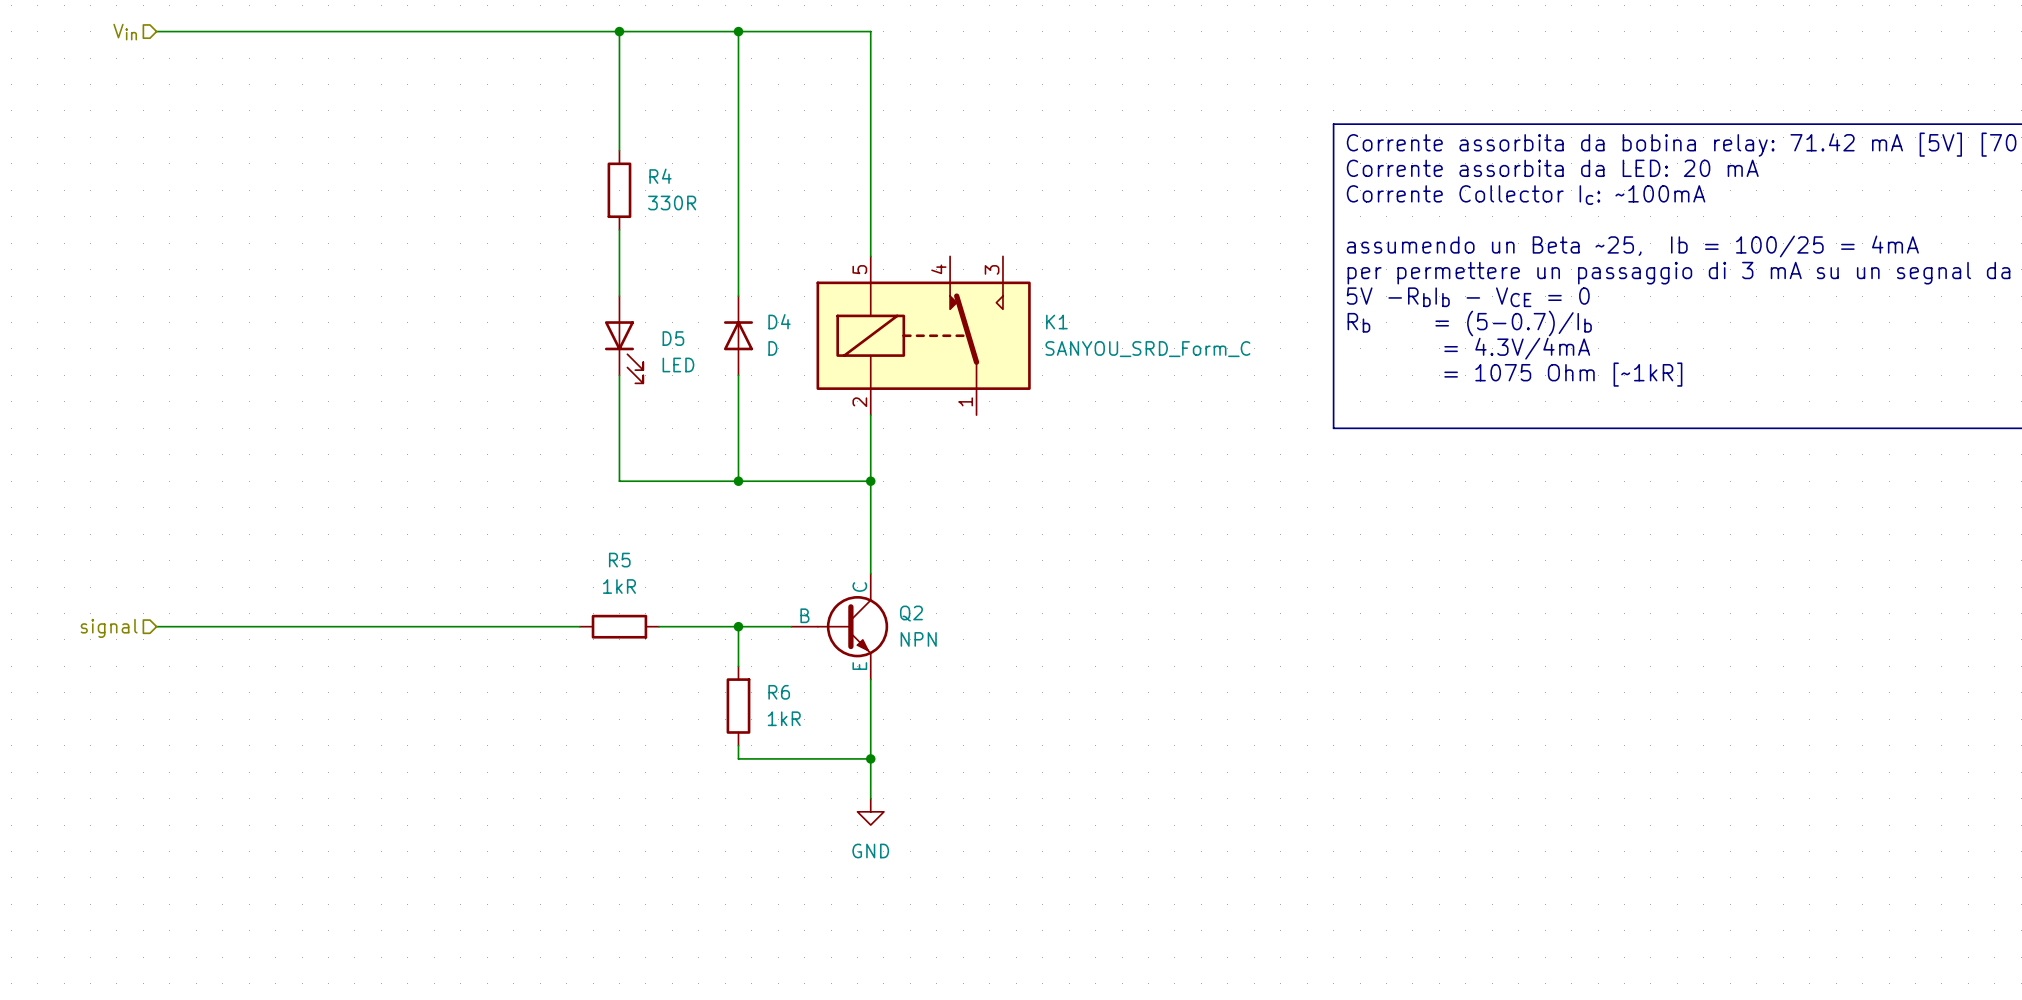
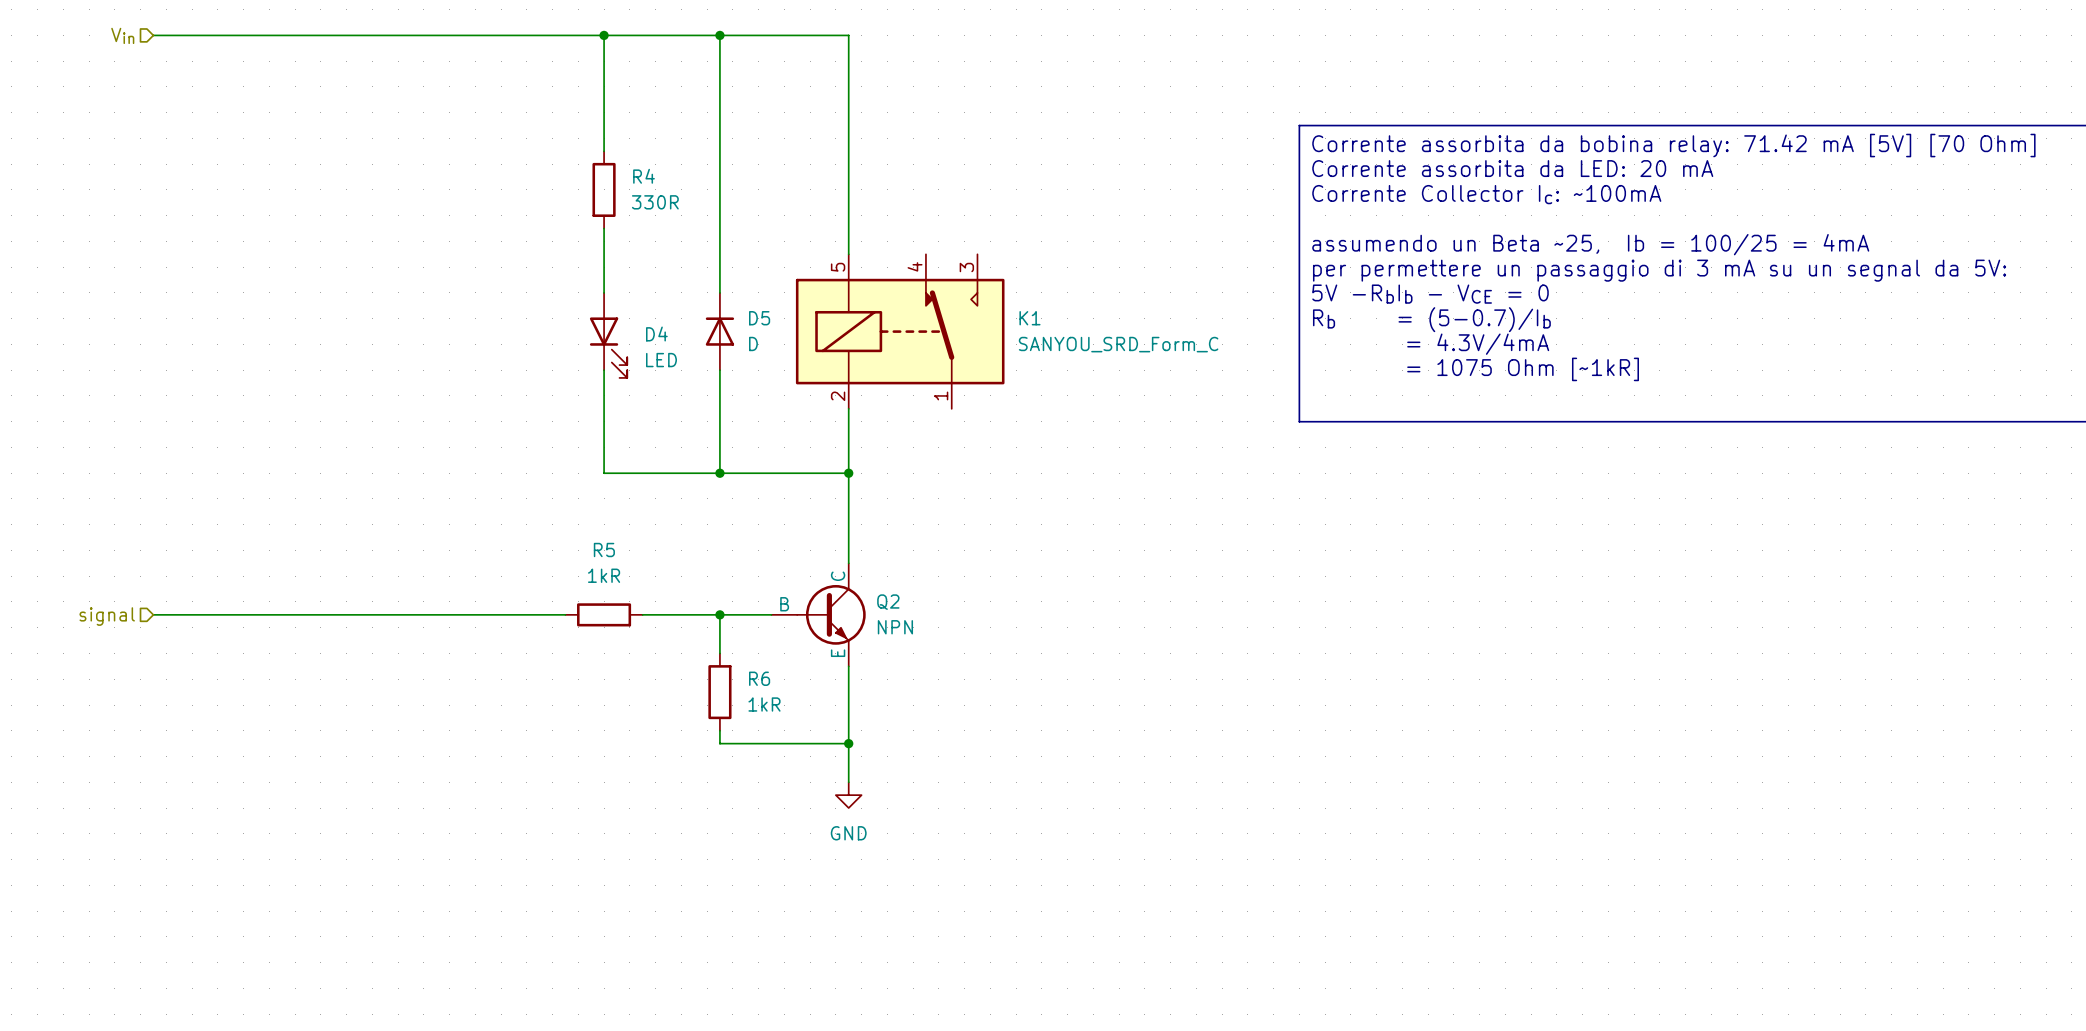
D4 name: D4 (779, 321) -> D5 (759, 318)
D5 name: D5 (673, 338) -> D4 (656, 334)

